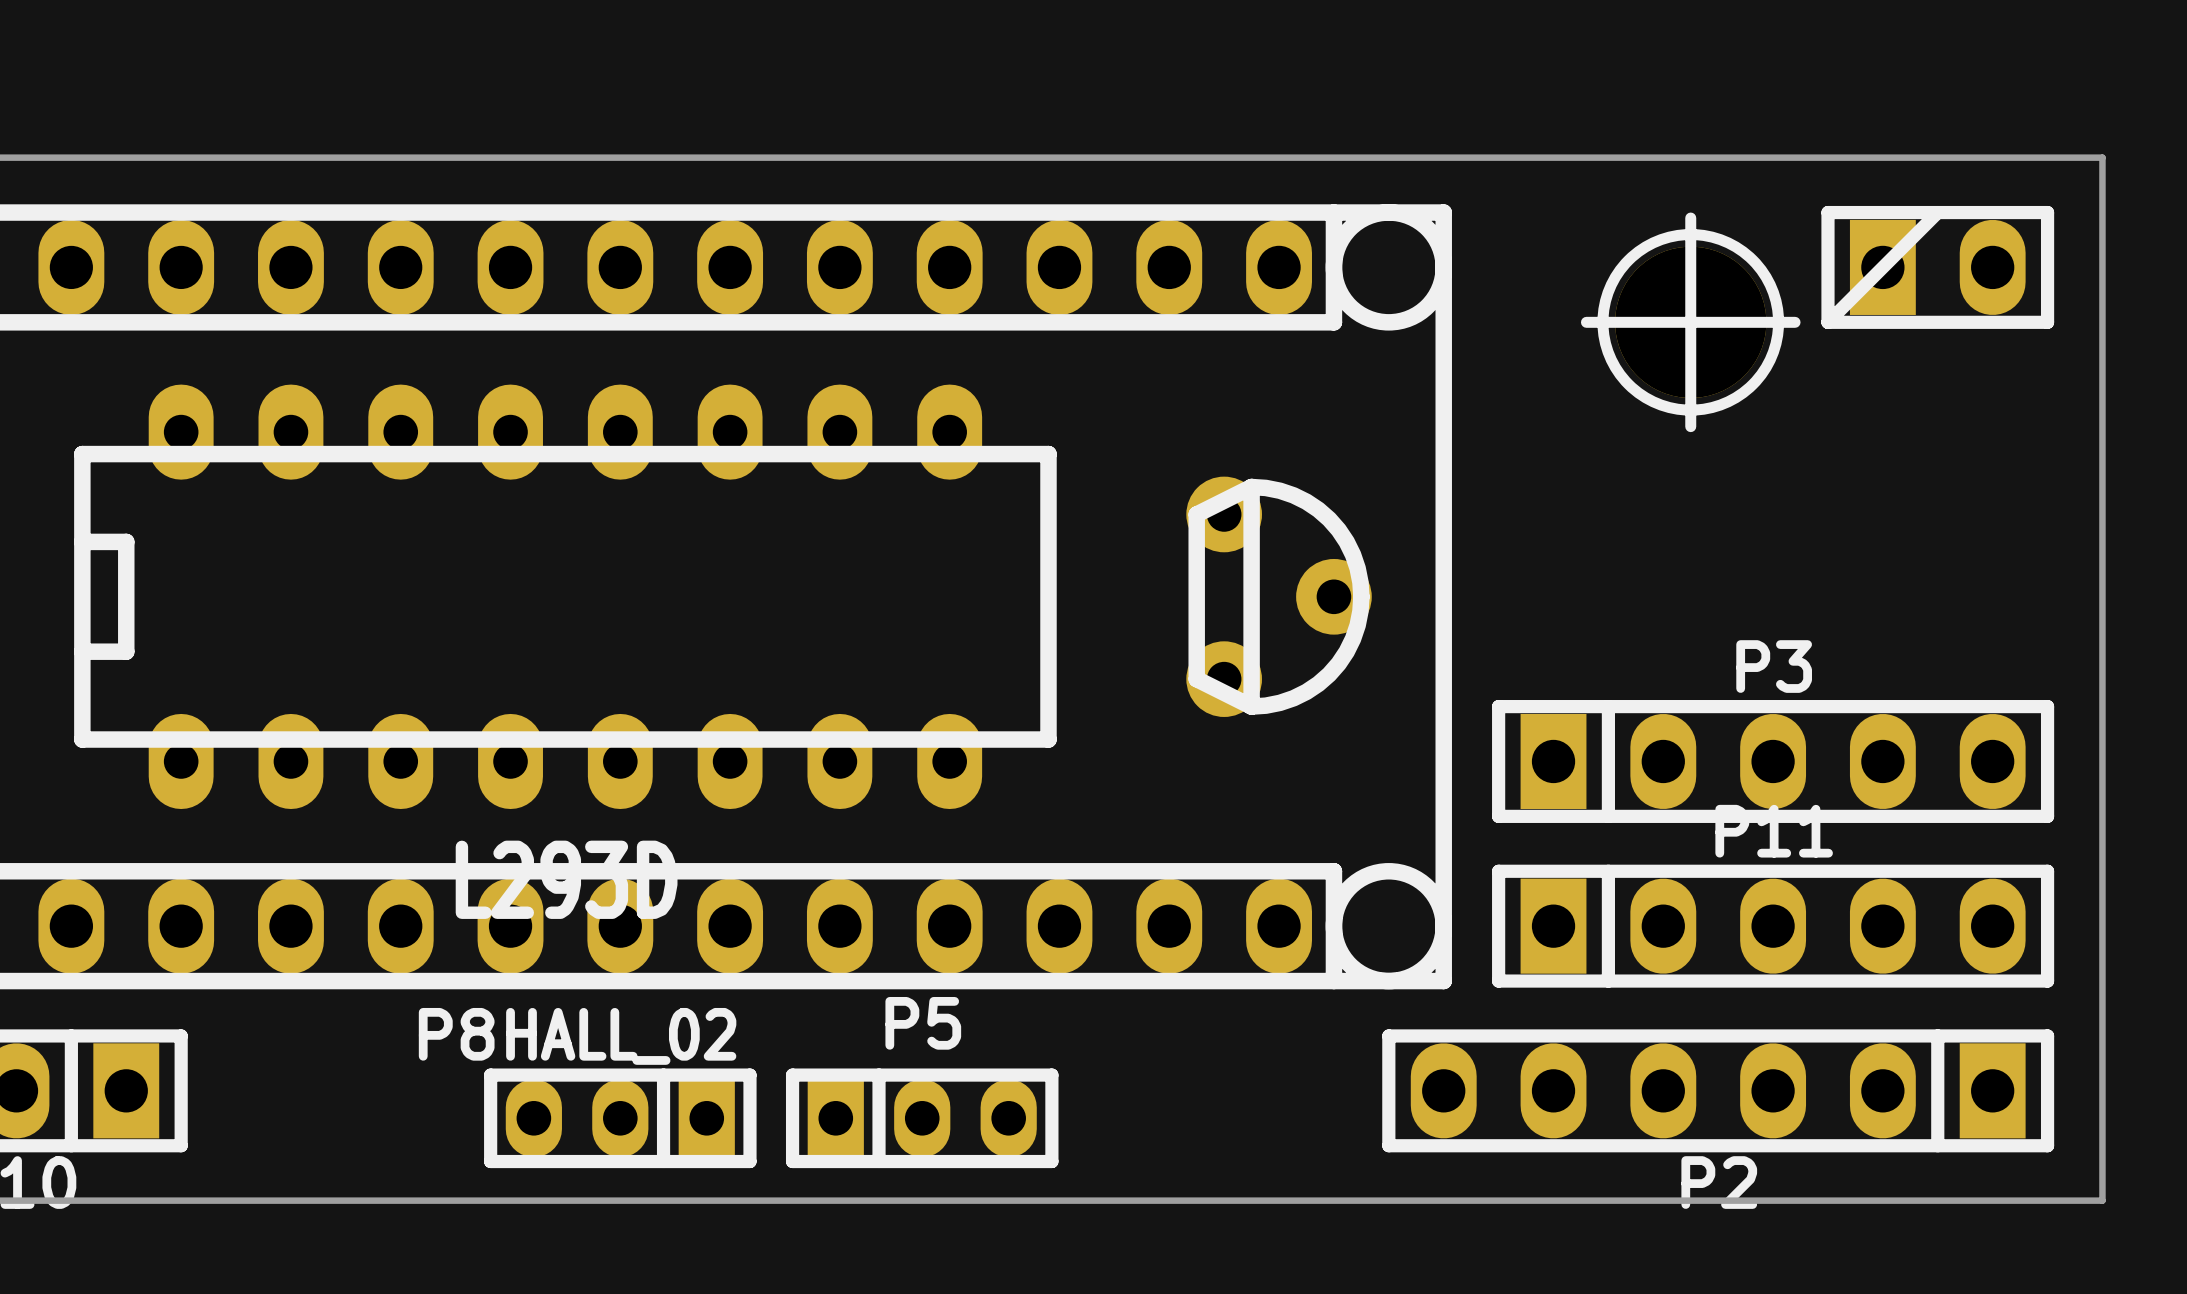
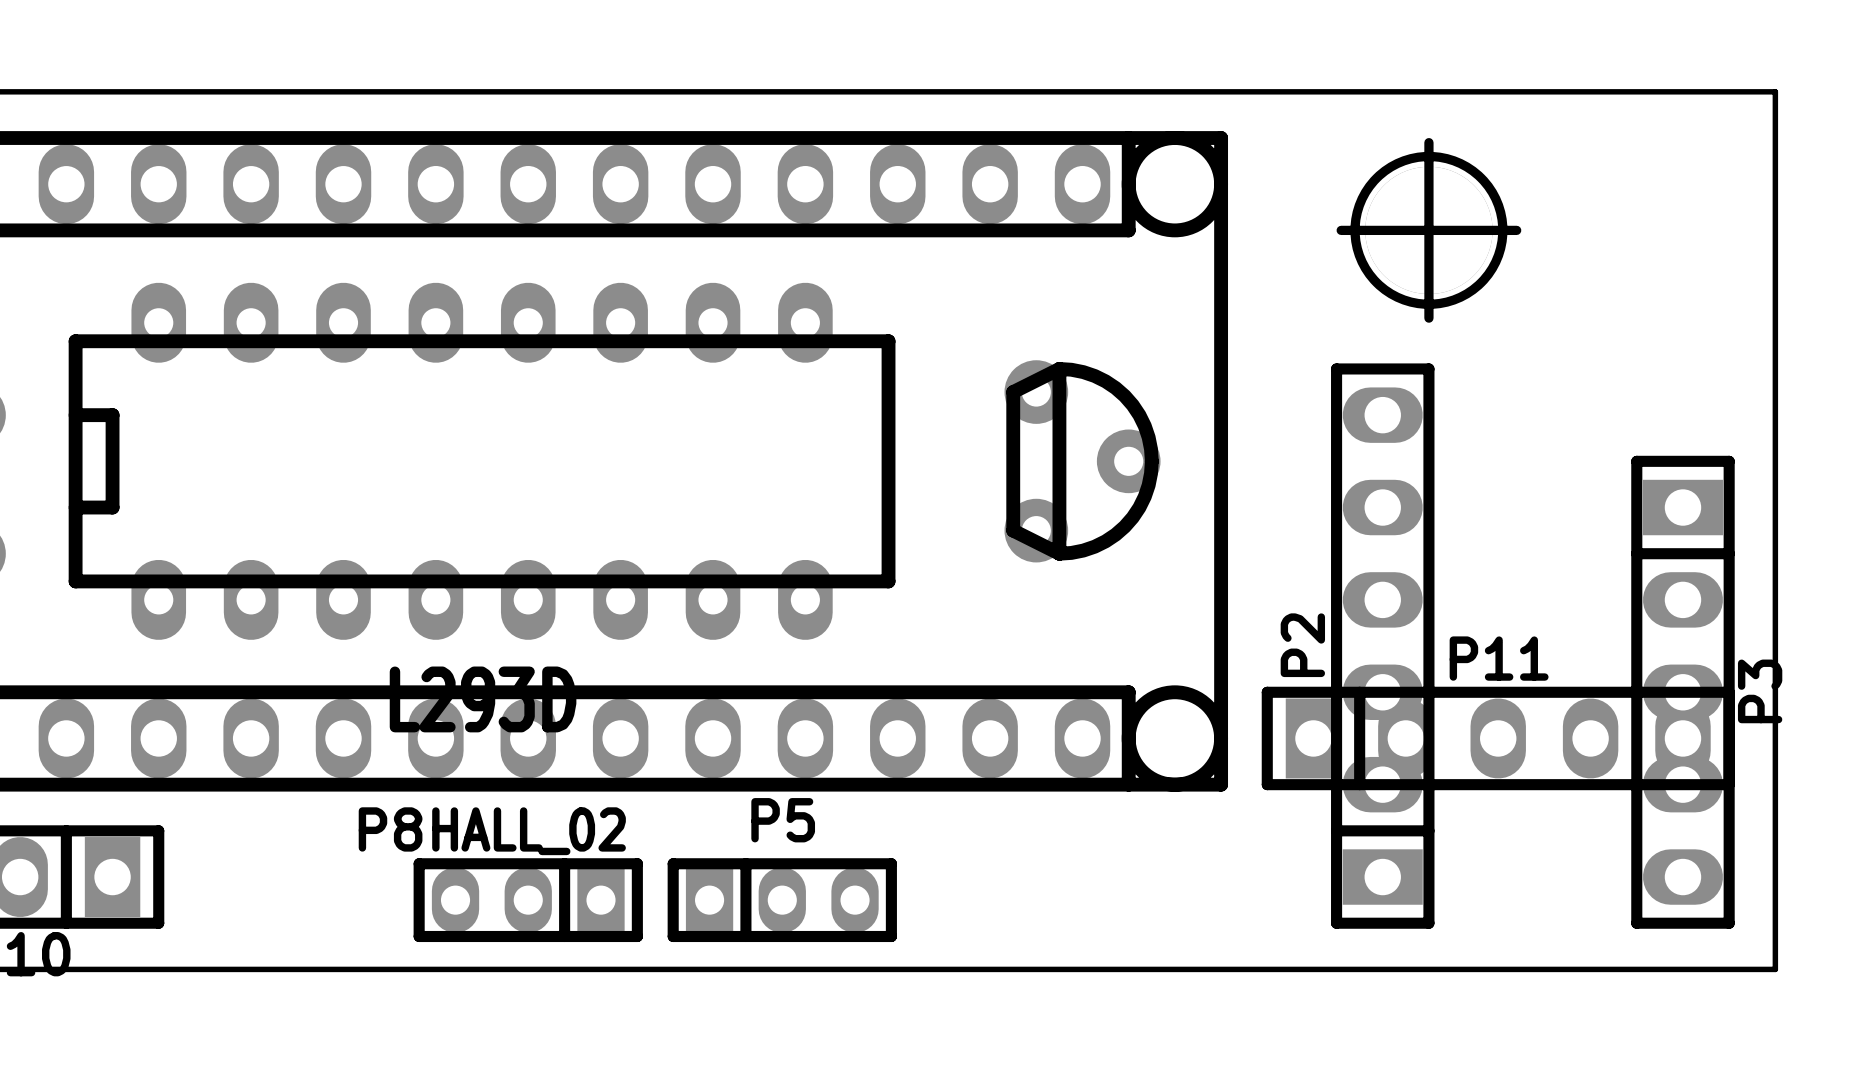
part: (1937, 267) -> none
P3 rotation: 0° (1773, 761) -> 90° clockwise (1682, 692)
P2 rotation: 0° (1718, 1090) -> 90° clockwise (1382, 646)

